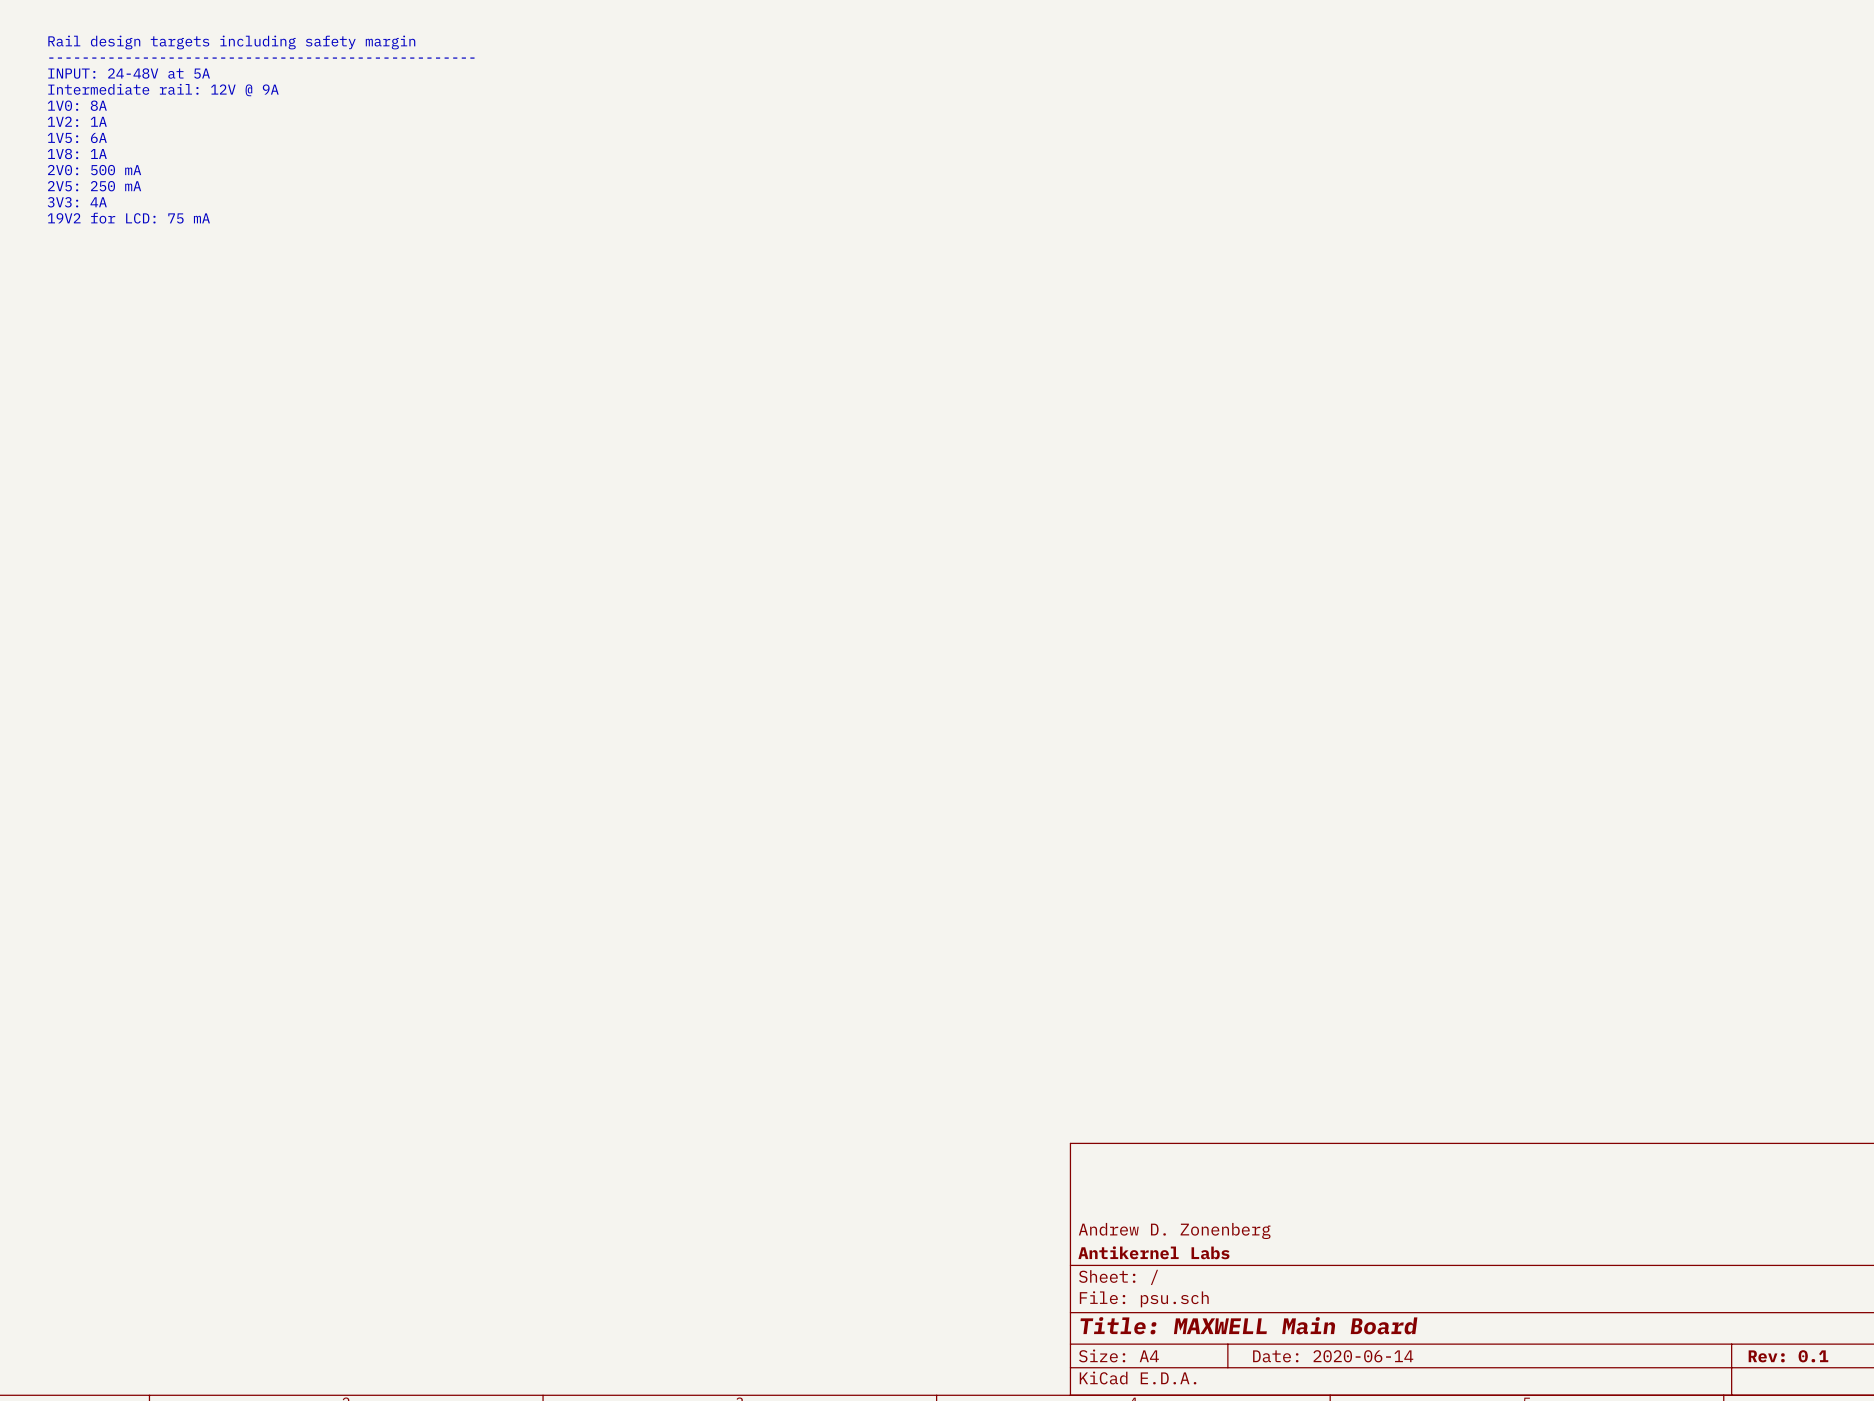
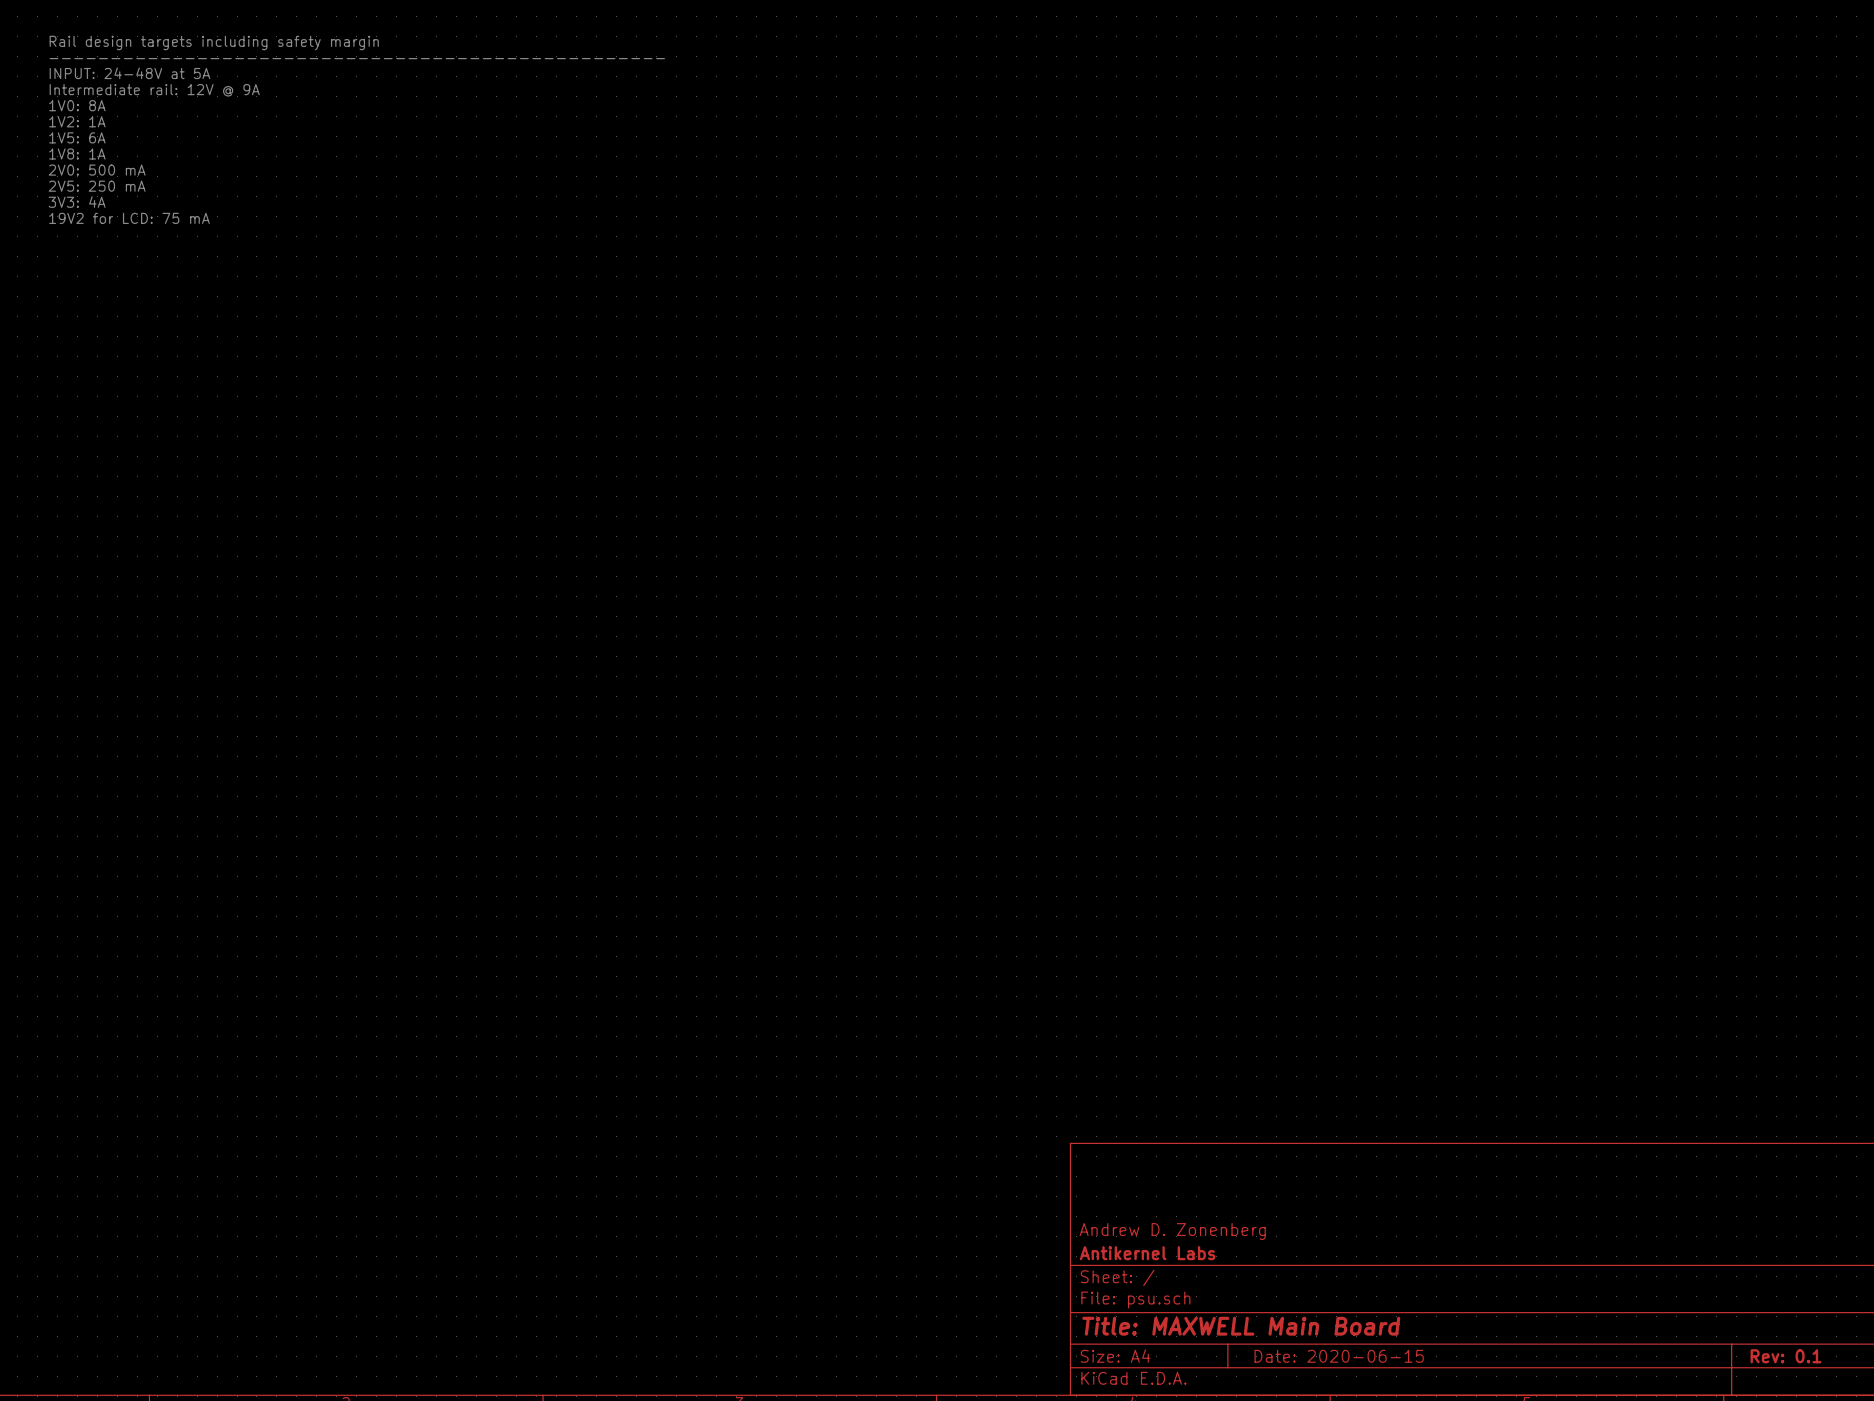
title block: Date: 2020-06-14 (1333, 1356) -> Date: 2020-06-15 (1339, 1356)

